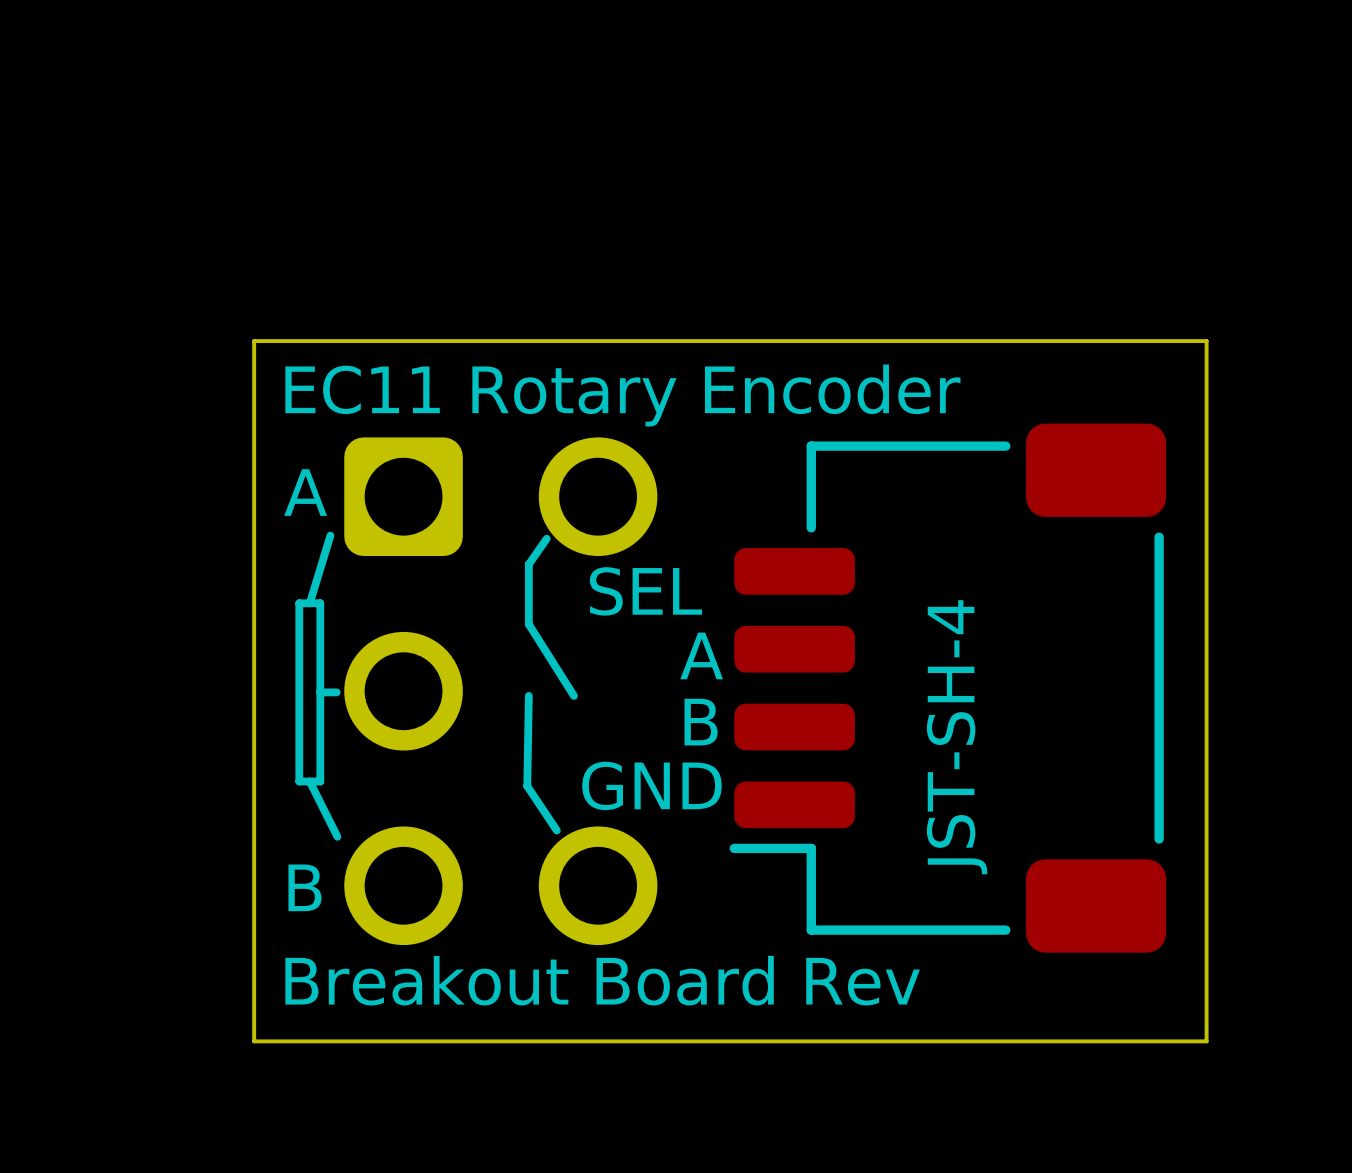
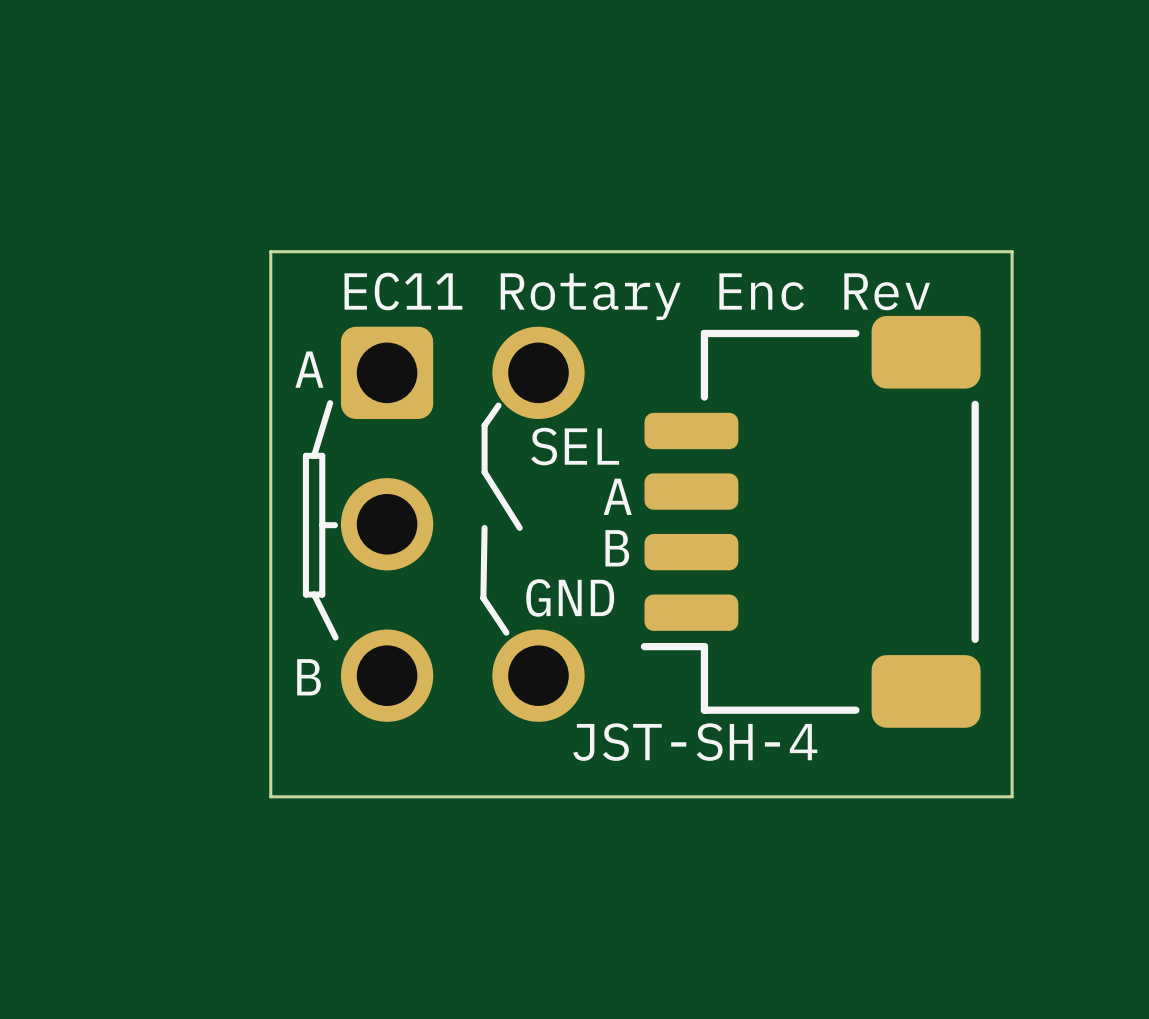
text: EC11 Rotary Encoder (622, 395) -> EC11 Rotary Enc Rev (637, 296)
text rotation: 0° (957, 737) -> 90° clockwise (695, 742)
text: Breakout Board Rev (602, 980) -> none

